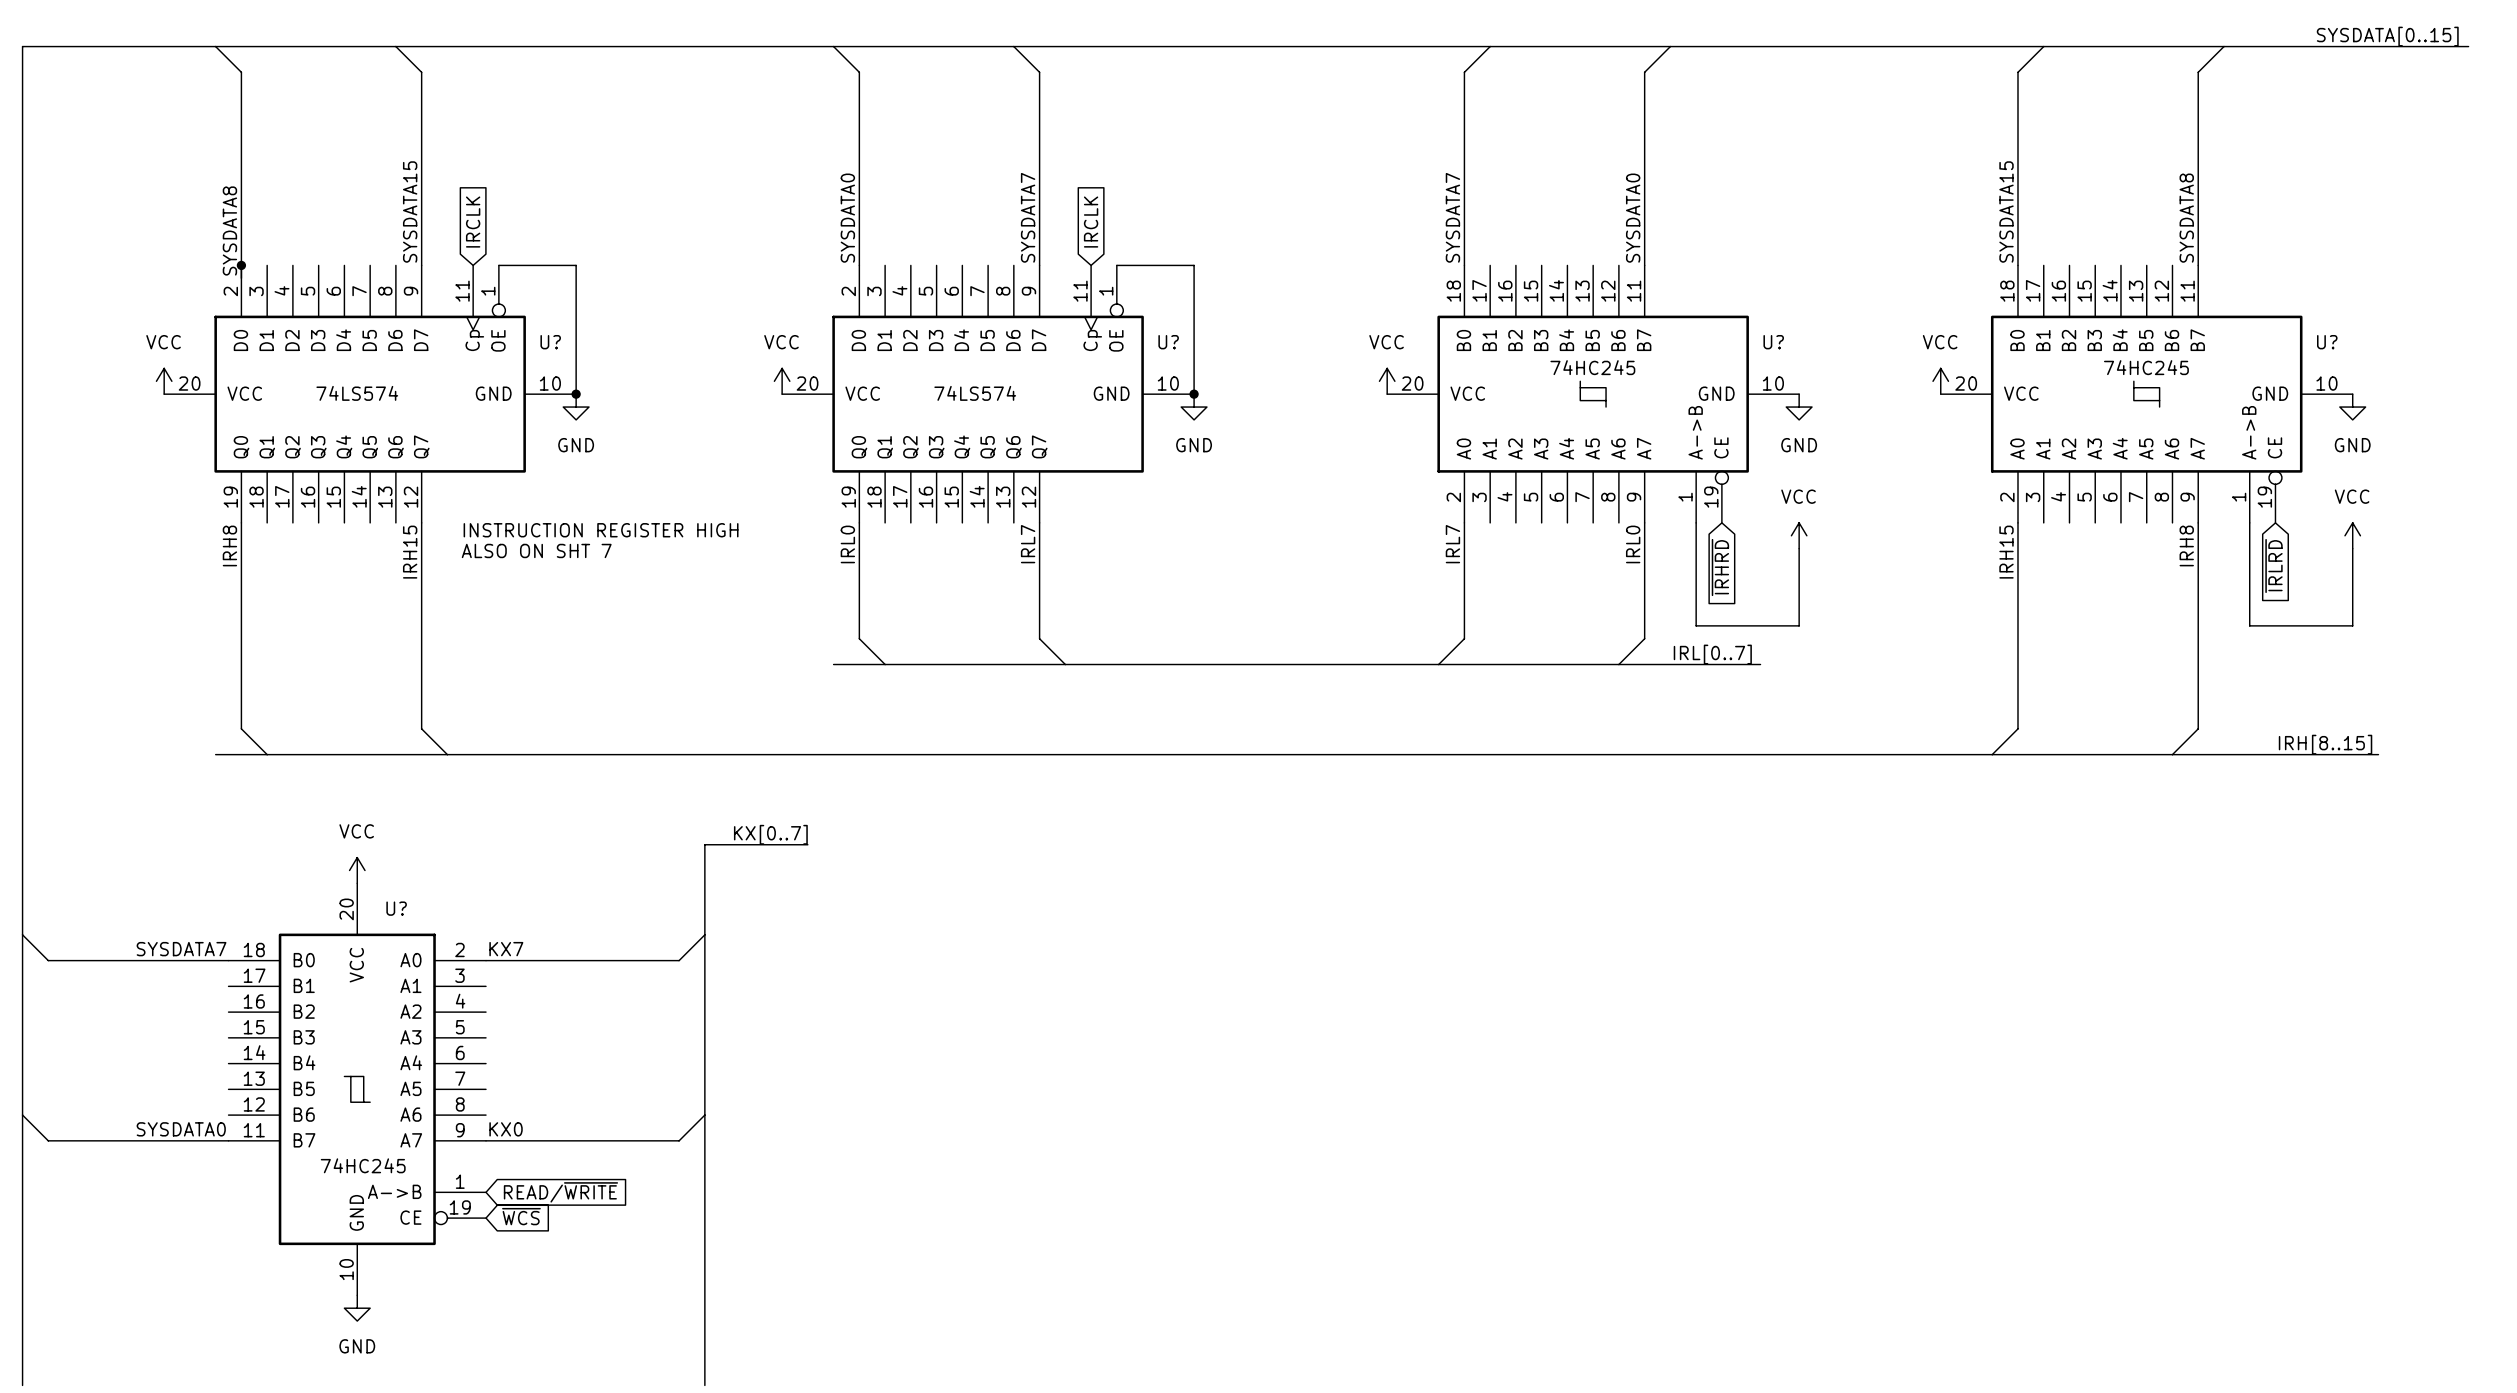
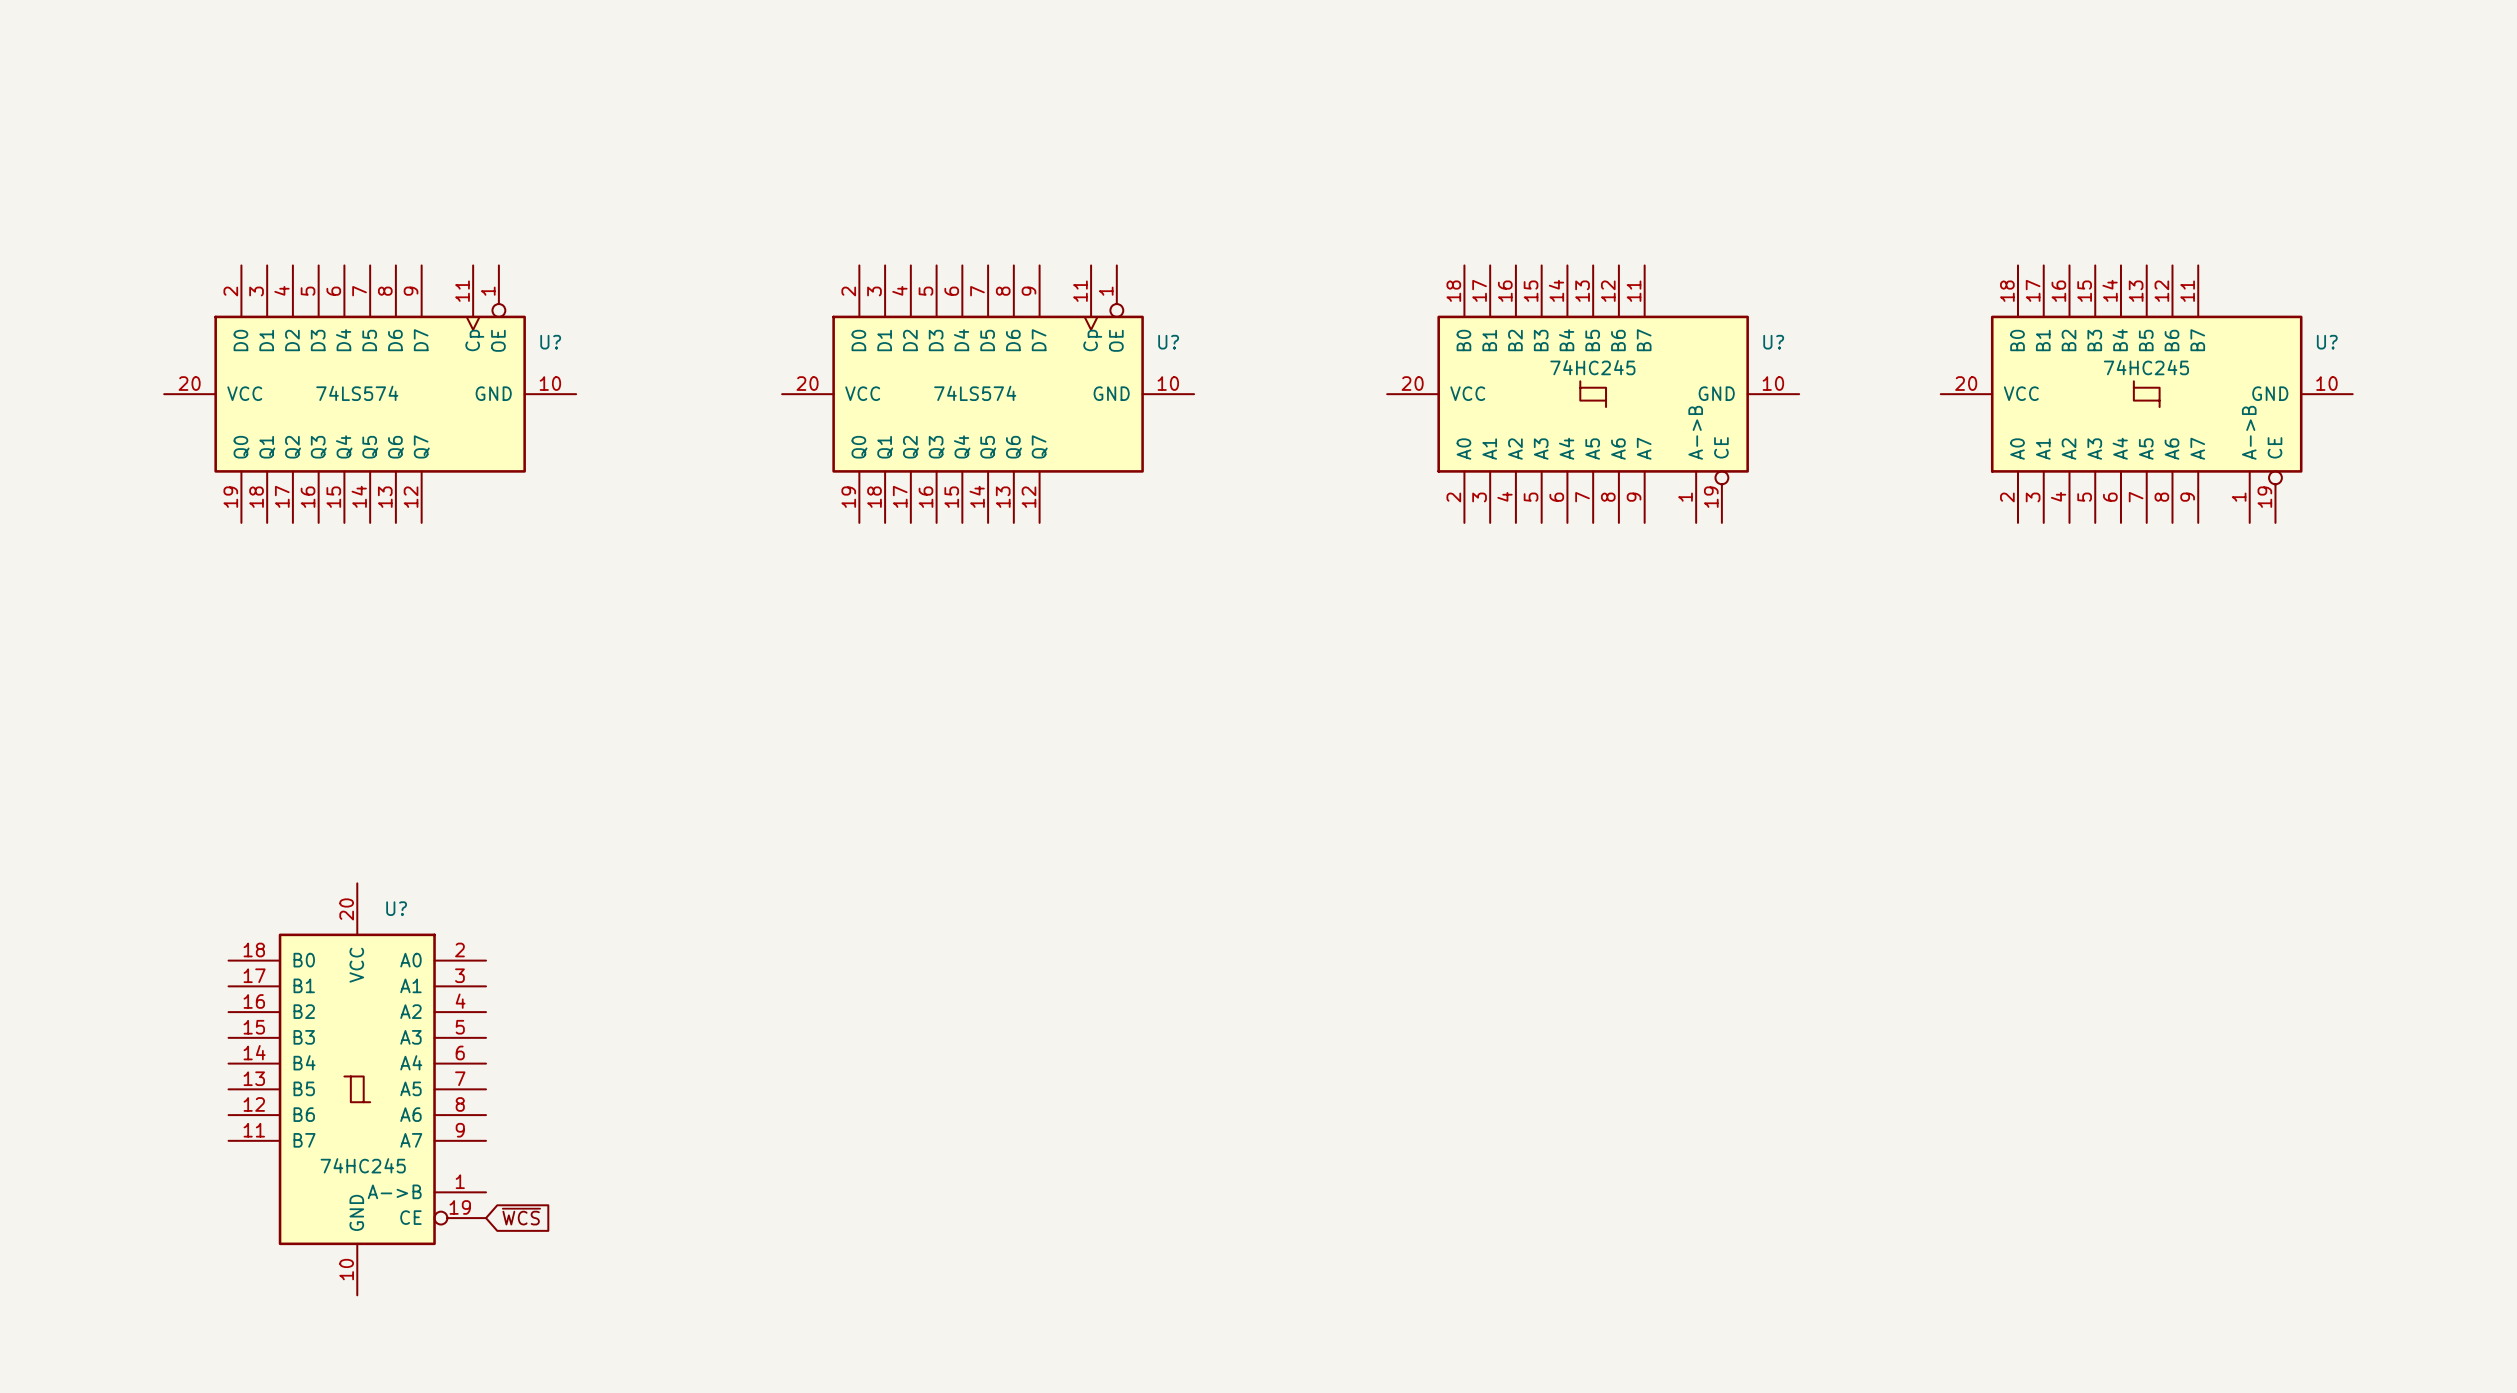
label: SYSDATA[0..15] (2387, 36) -> none
wire: (215, 46) (241, 72) (241, 278) -> none
wire: (395, 46) (421, 72) (421, 265) -> none
wire: (833, 46) (859, 72) (859, 265) -> none
wire: (1013, 46) (1039, 72) (1039, 265) -> none
wire: (1490, 46) (1464, 72) (1464, 265) -> none
wire: (1670, 46) (1644, 72) (1644, 265) -> none
wire: (2043, 46) (2017, 72) (2017, 265) -> none
wire: (2223, 46) (2198, 72) (2198, 265) -> none
bus: (2468, 46) (22, 46) (22, 1385) -> none
label: SYSDATA15 (410, 211) -> none
label: SYSDATA15 (2006, 211) -> none
label: SYSDATA7 (1028, 217) -> none
label: SYSDATA7 (1452, 217) -> none
label: SYSDATA0 (847, 218) -> none
label: SYSDATA0 (1633, 218) -> none
label: SYSDATA8 (2186, 218) -> none
global label: IRCLK (473, 222) -> none
global label: IRCLK (1091, 222) -> none
label: SYSDATA8 (229, 231) -> none
junction: (241, 265) -> none
wire: (498, 265) (576, 265) (576, 394) -> none
wire: (1116, 265) (1194, 265) (1194, 394) -> none
power symbol: VCC (164, 381) -> none
power symbol: VCC (782, 381) -> none
power symbol: VCC (1387, 381) -> none
power symbol: VCC (1940, 381) -> none
junction: (576, 394) -> none
junction: (1194, 394) -> none
power symbol: GND (576, 407) -> none
power symbol: GND (1194, 407) -> none
power symbol: GND (1799, 407) -> none
power symbol: GND (2352, 407) -> none
wire: (241, 522) (241, 728) (267, 754) -> none
wire: (421, 522) (421, 728) (447, 754) -> none
wire: (859, 522) (859, 638) (885, 664) -> none
wire: (1039, 522) (1039, 638) (1065, 664) -> none
wire: (1464, 522) (1464, 638) (1438, 664) -> none
wire: (1644, 522) (1644, 638) (1618, 664) -> none
wire: (1696, 522) (1696, 625) (1799, 625) (1799, 548) -> none
wire: (2017, 522) (2017, 728) (1992, 754) -> none
wire: (2198, 522) (2198, 728) (2172, 754) -> none
wire: (2249, 522) (2249, 625) (2352, 625) (2352, 548) -> none
text: INSTRUCTION REGISTER HIGH (601, 530) -> none
power symbol: VCC (1799, 535) -> none
power symbol: VCC (2352, 535) -> none
label: IRL0 (847, 544) -> none
label: IRL7 (1028, 544) -> none
label: IRL7 (1452, 544) -> none
label: IRL0 (1633, 544) -> none
label: IRH8 (229, 545) -> none
label: IRH8 (2186, 545) -> none
text: ALSO ON SHT 7 (536, 550) -> none
label: IRH15 (410, 552) -> none
label: IRH15 (2006, 552) -> none
global label: ~{IRLRD} (2273, 565) -> none
global label: ~{IRHRD} (1720, 567) -> none
label: IRL[0..7] (1712, 654) -> none
bus: (833, 664) (1760, 664) -> none
label: IRH[8..15] (2325, 744) -> none
bus: (215, 754) (2378, 754) -> none
label: KX[0..7] (770, 834) -> none
bus: (807, 844) (704, 844) (704, 1385) -> none
power symbol: VCC (357, 870) -> none
wire: (22, 934) (48, 960) (228, 960) -> none
wire: (704, 934) (679, 960) (486, 960) -> none
label: SYSDATA7 (181, 949) -> none
label: KX7 (506, 949) -> none
wire: (22, 1115) (48, 1140) (228, 1140) -> none
wire: (704, 1115) (679, 1140) (486, 1140) -> none
label: SYSDATA0 (181, 1129) -> none
label: KX0 (506, 1129) -> none
global label: READ/~{WRITE} (560, 1192) -> none
power symbol: GND (357, 1308) -> none

